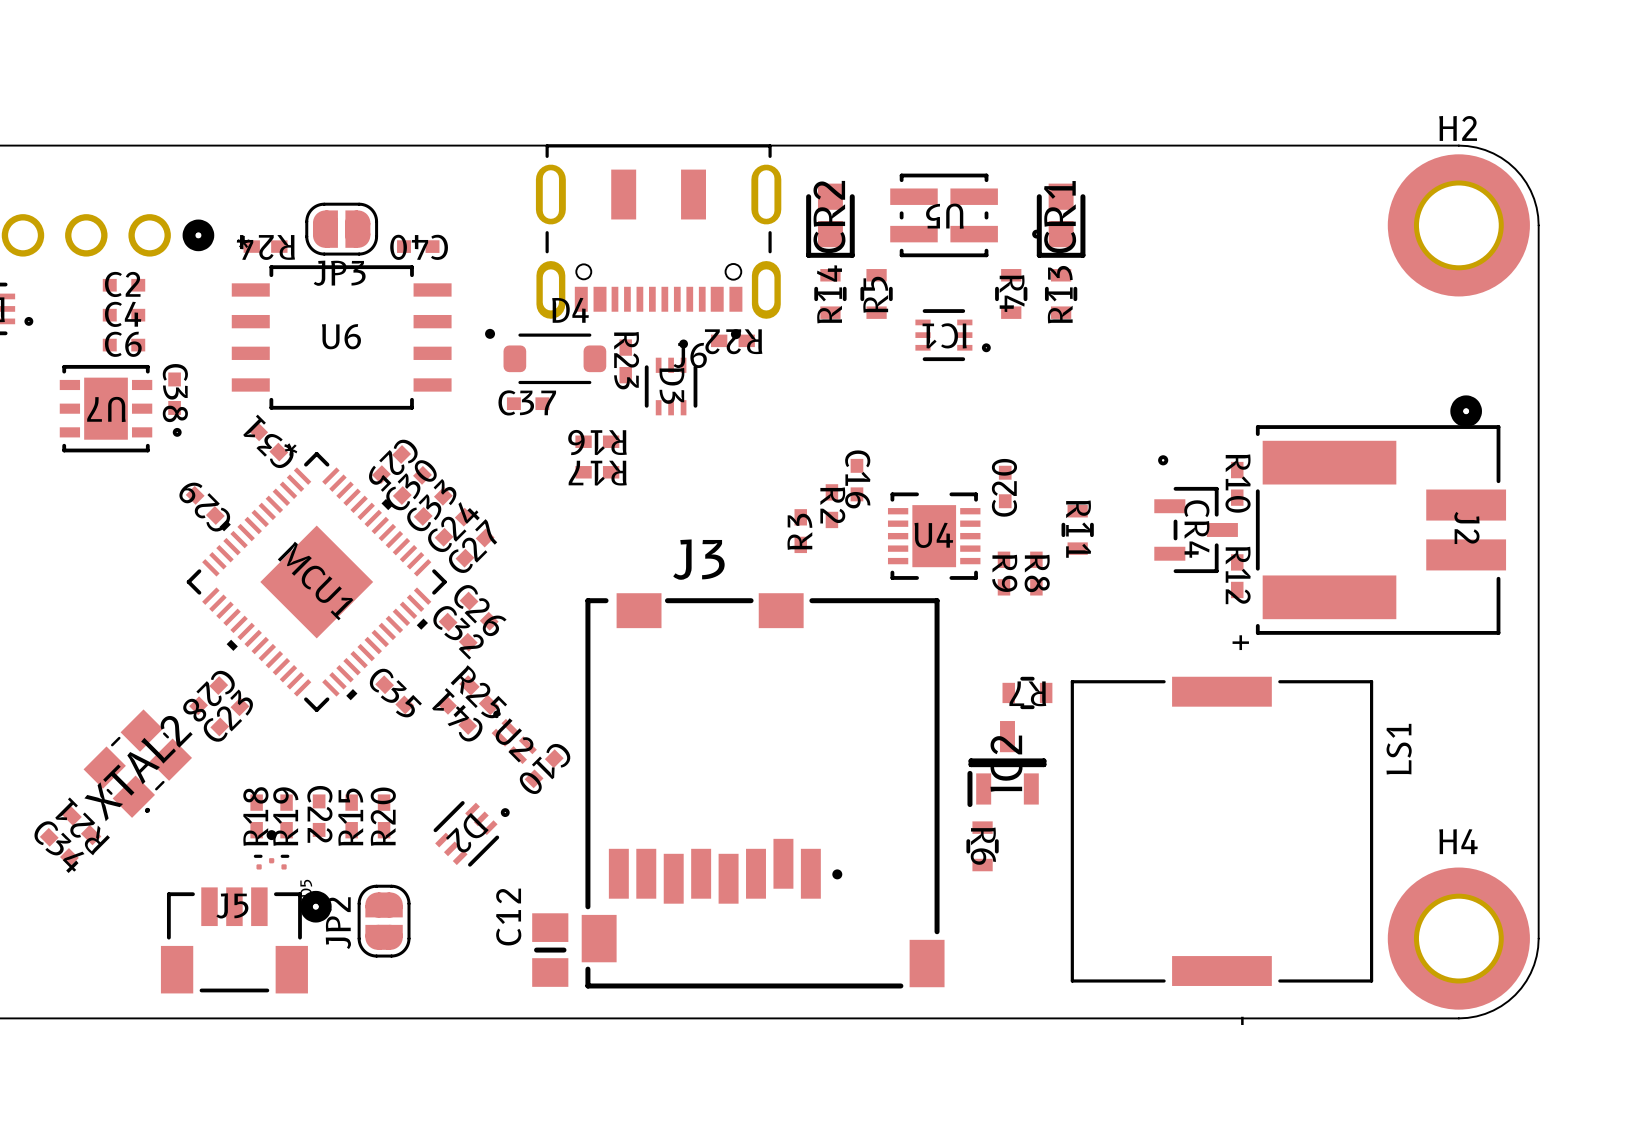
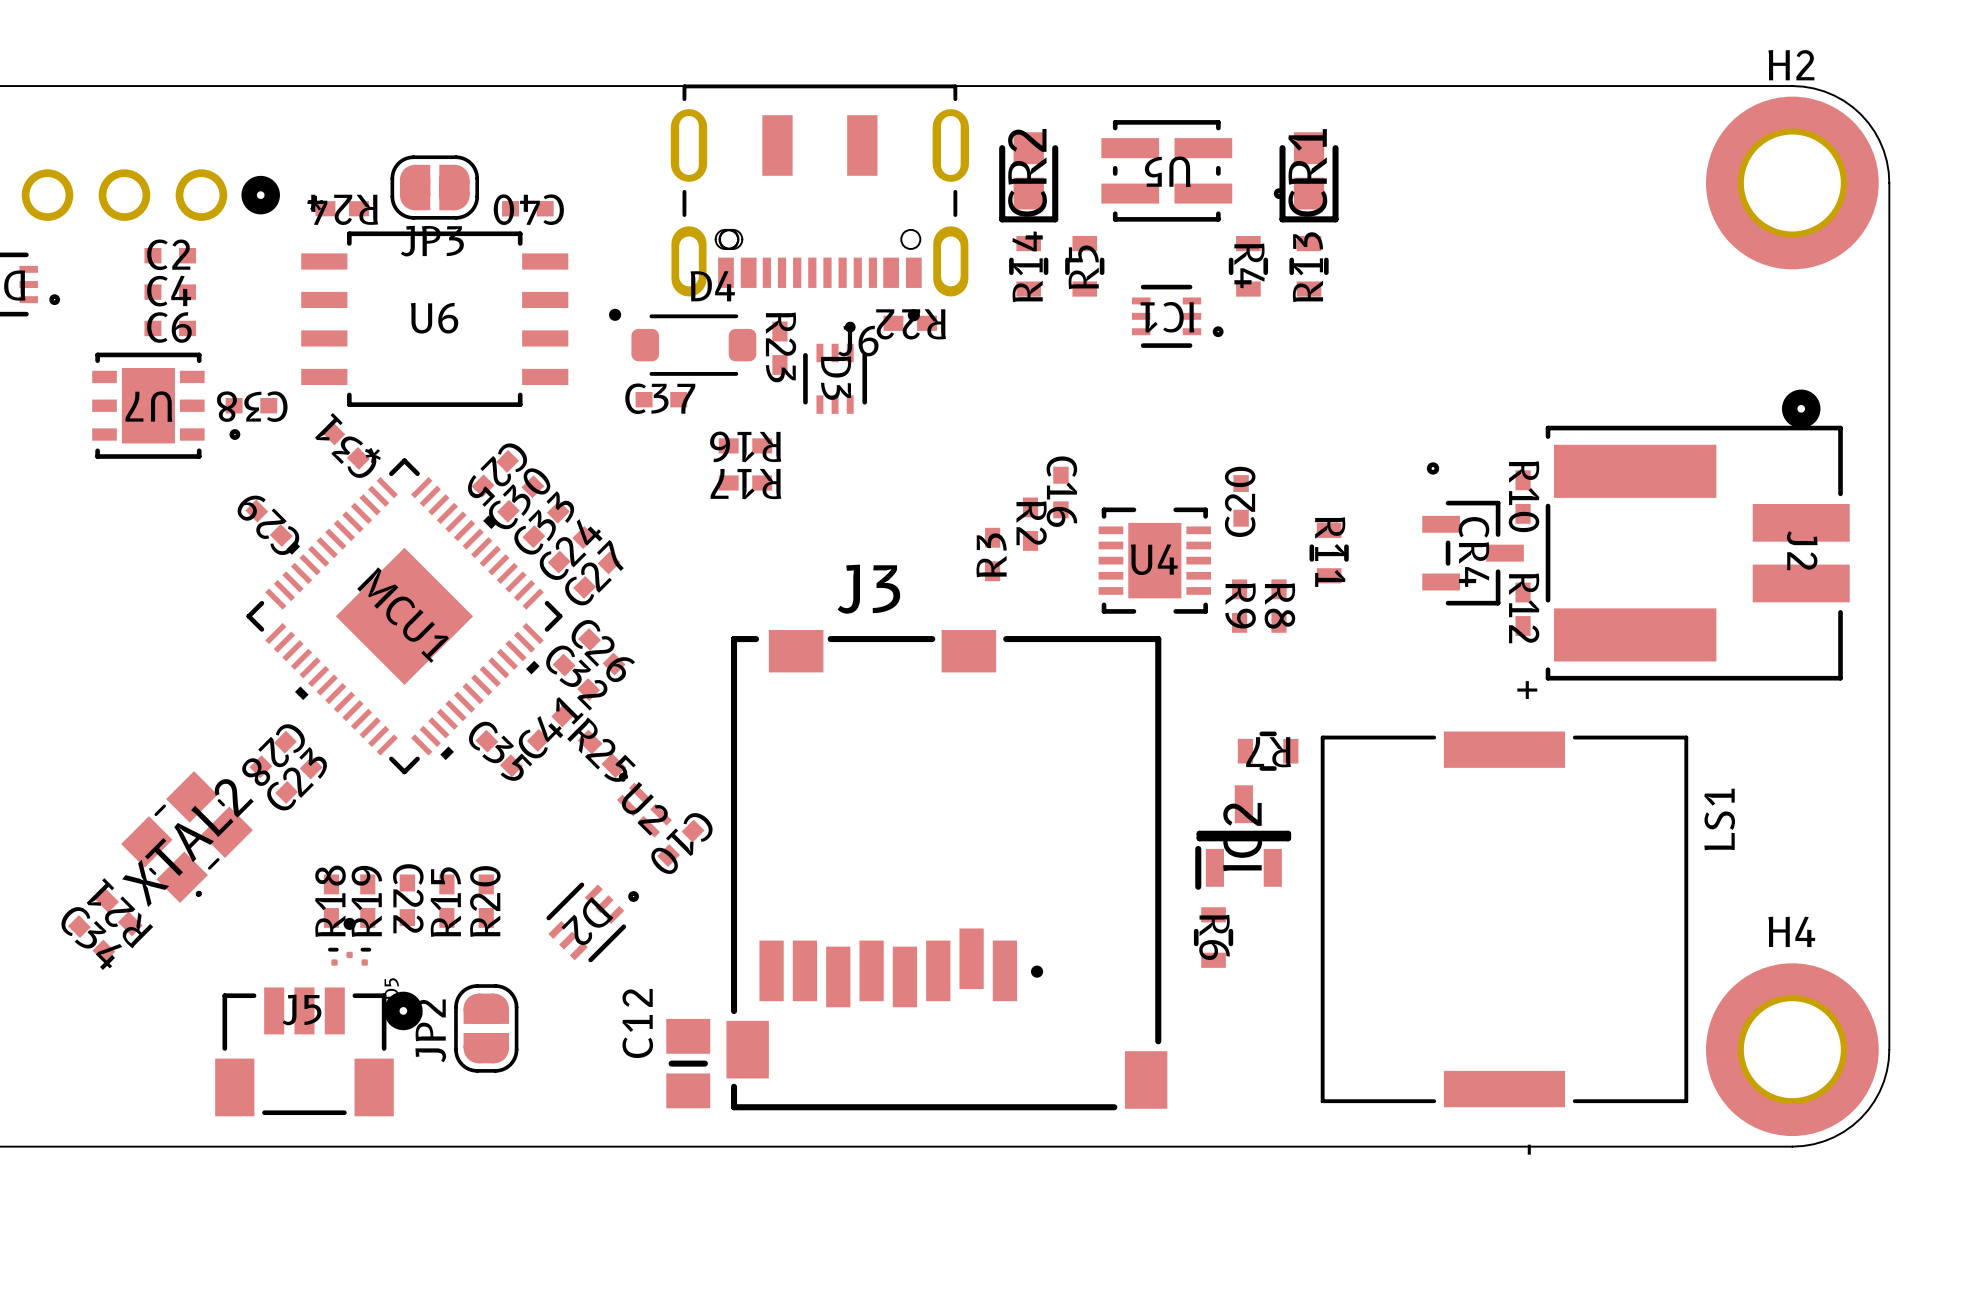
J6 footprint: [535, 144, 782, 340] -> [670, 84, 969, 322]
C38 rotation: 0° (174, 393) -> 90° clockwise (251, 405)
C41 rotation: 0° (457, 715) -> 90° clockwise (550, 728)
C41 position: (457, 715) -> (550, 728)

